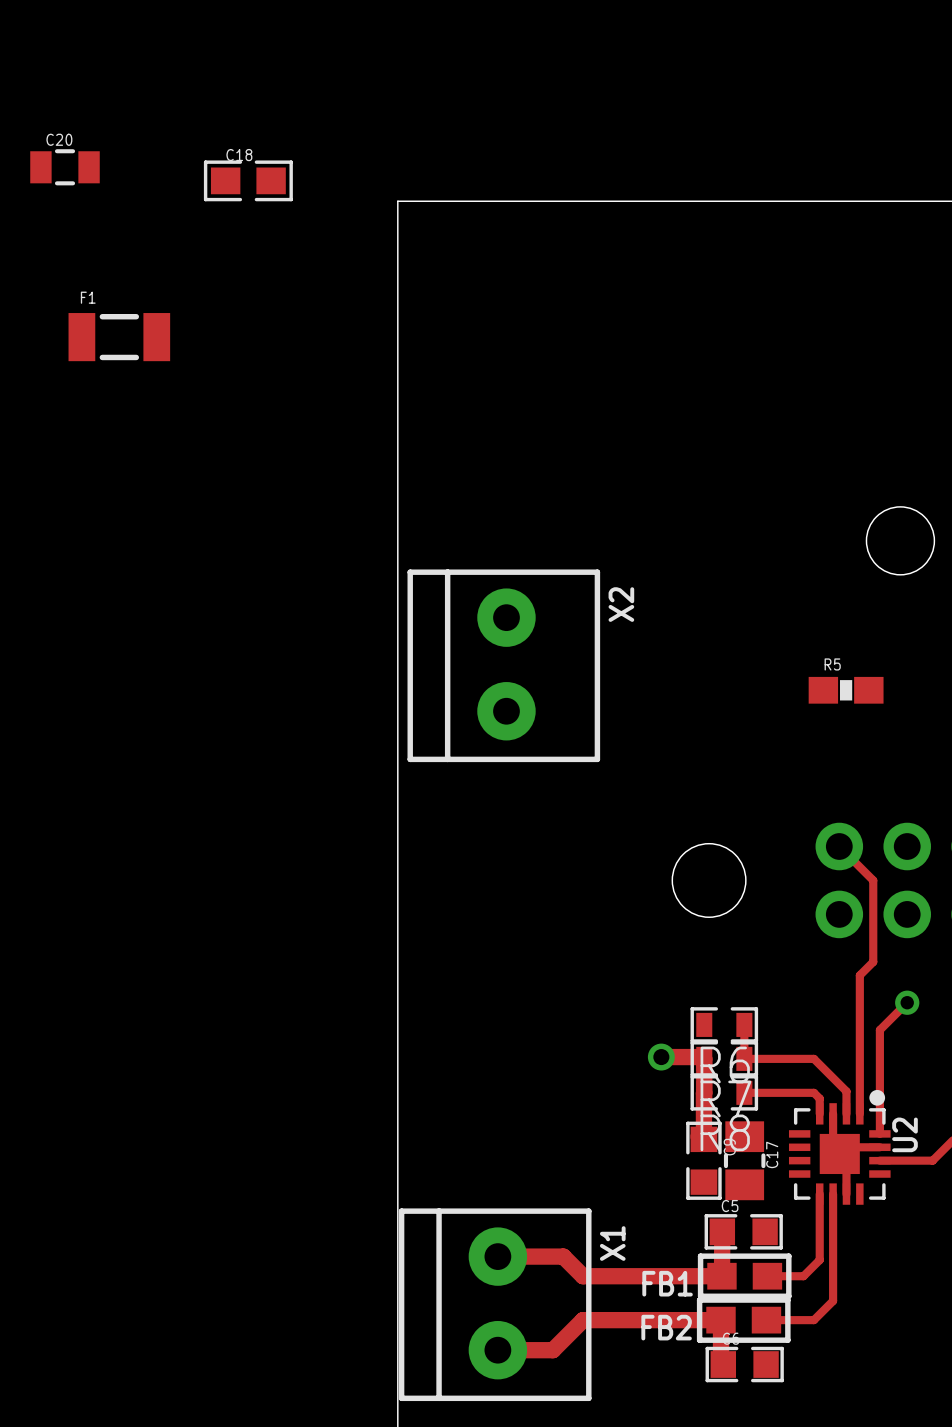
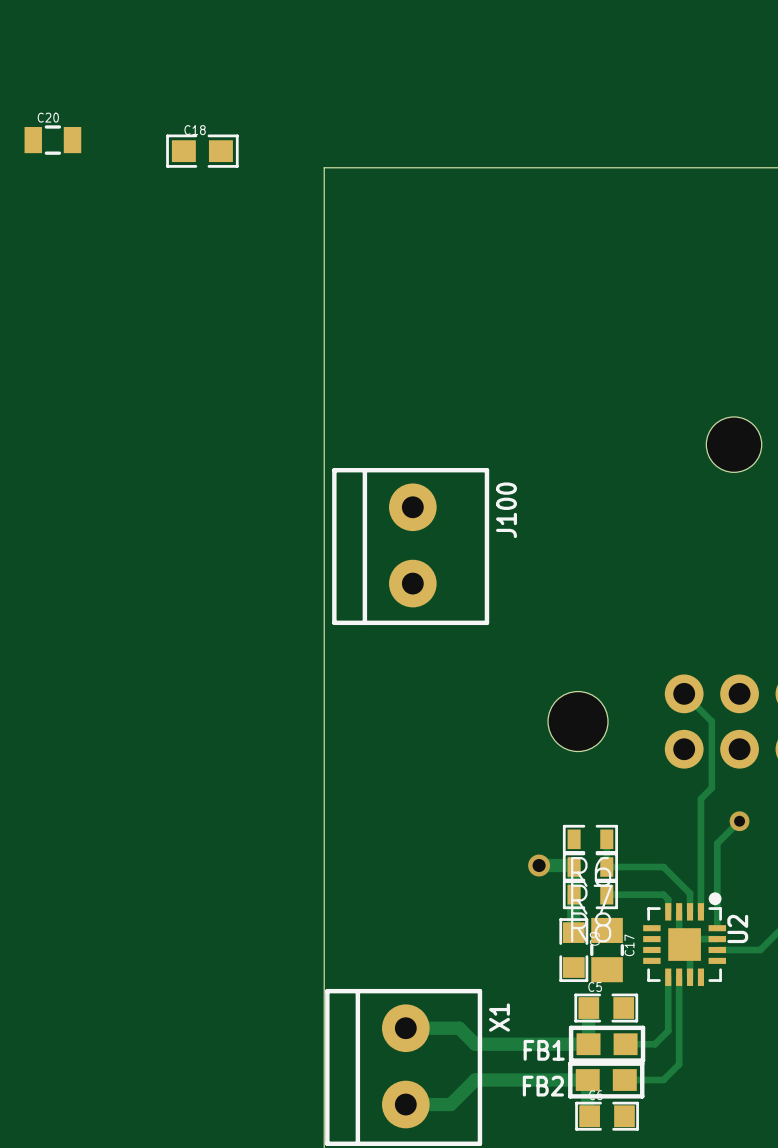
F1: (119, 337) -> none
X2 name: X2 (621, 604) -> J100 (506, 510)
R5: (846, 690) -> none

